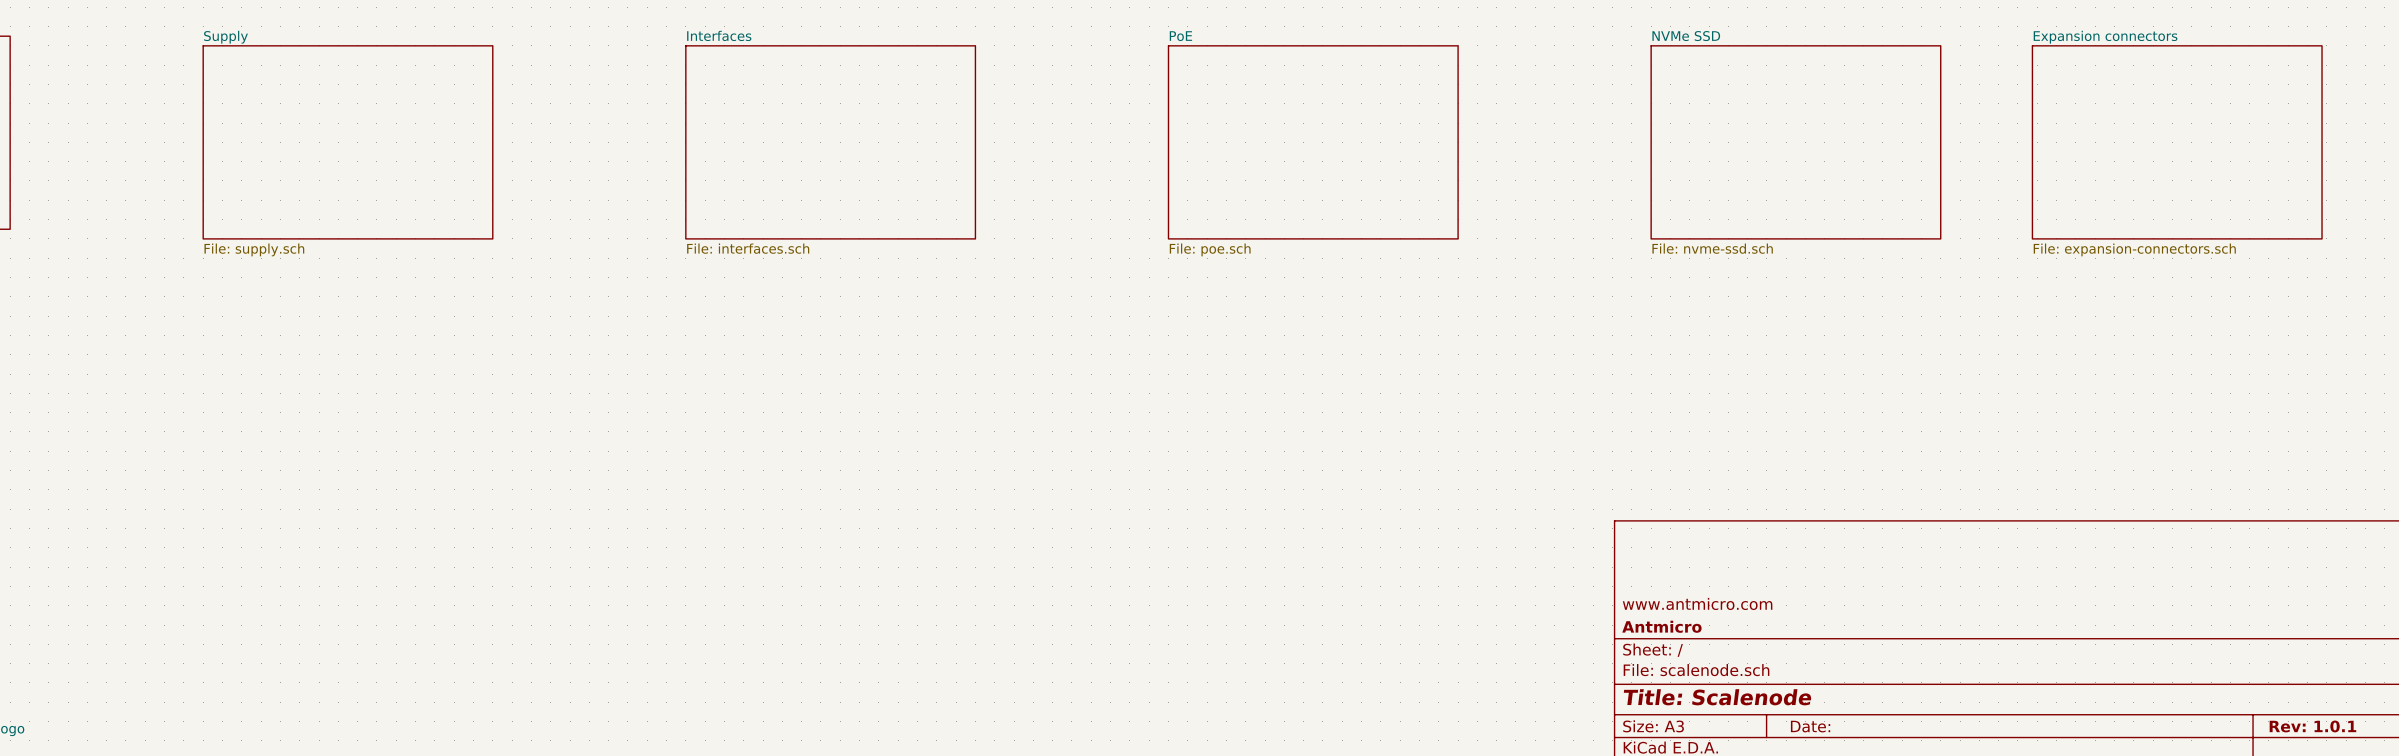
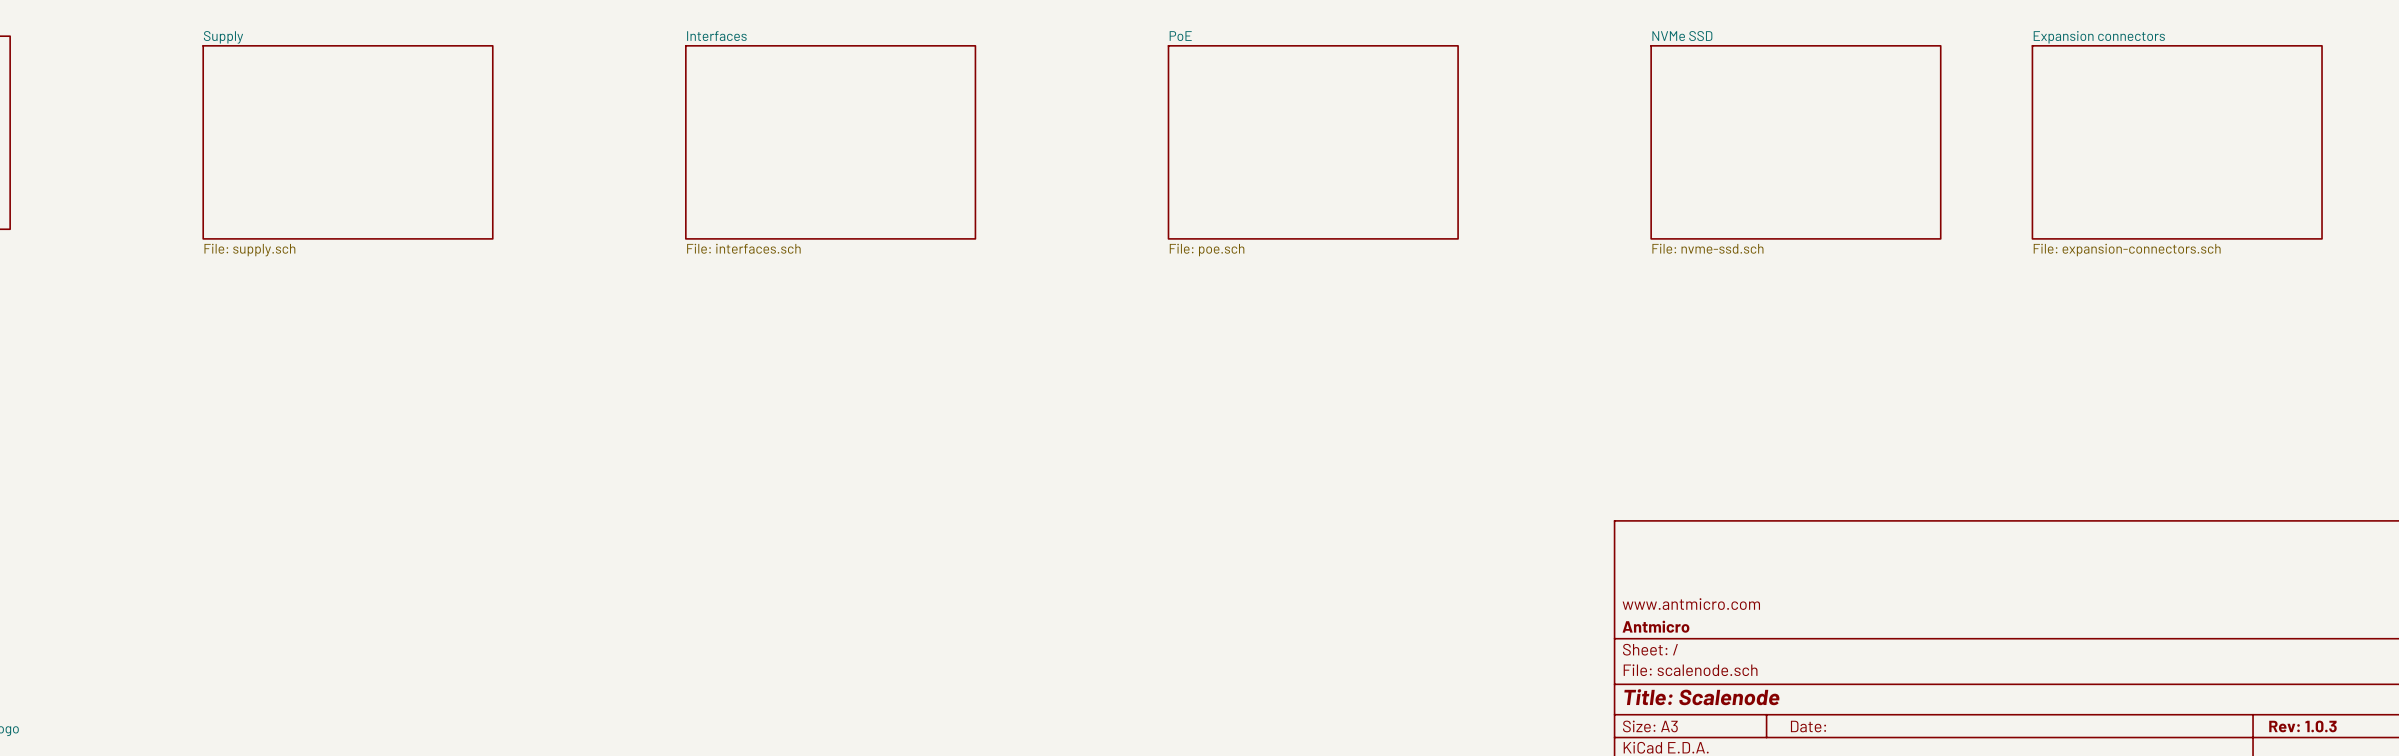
title block: Rev: 1.0.1 (2312, 726) -> Rev: 1.0.3 (2302, 726)

